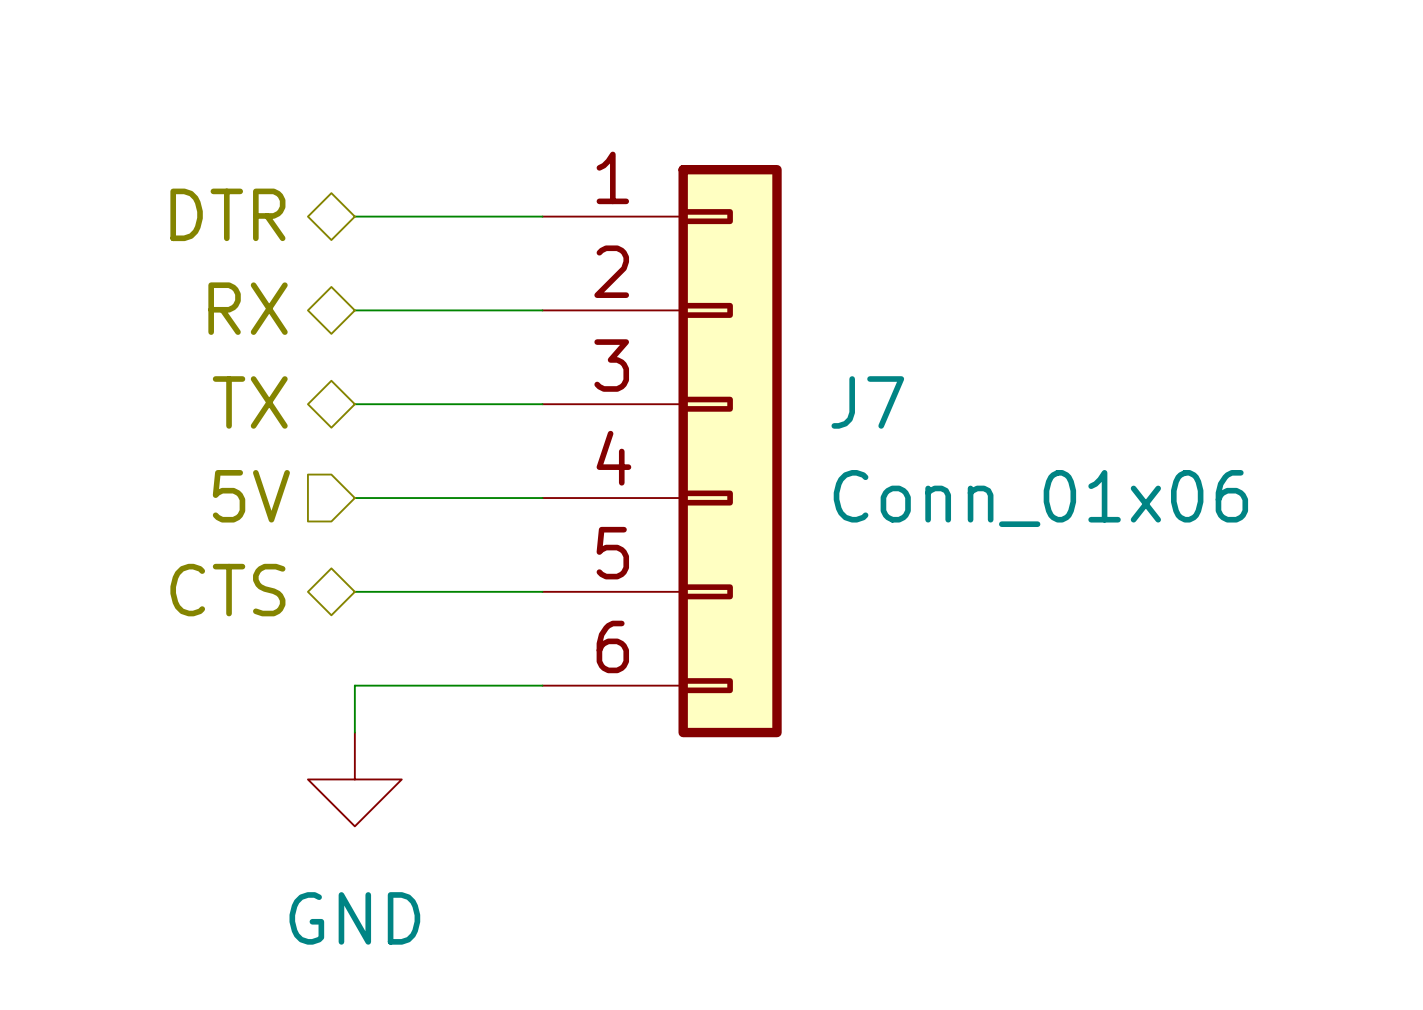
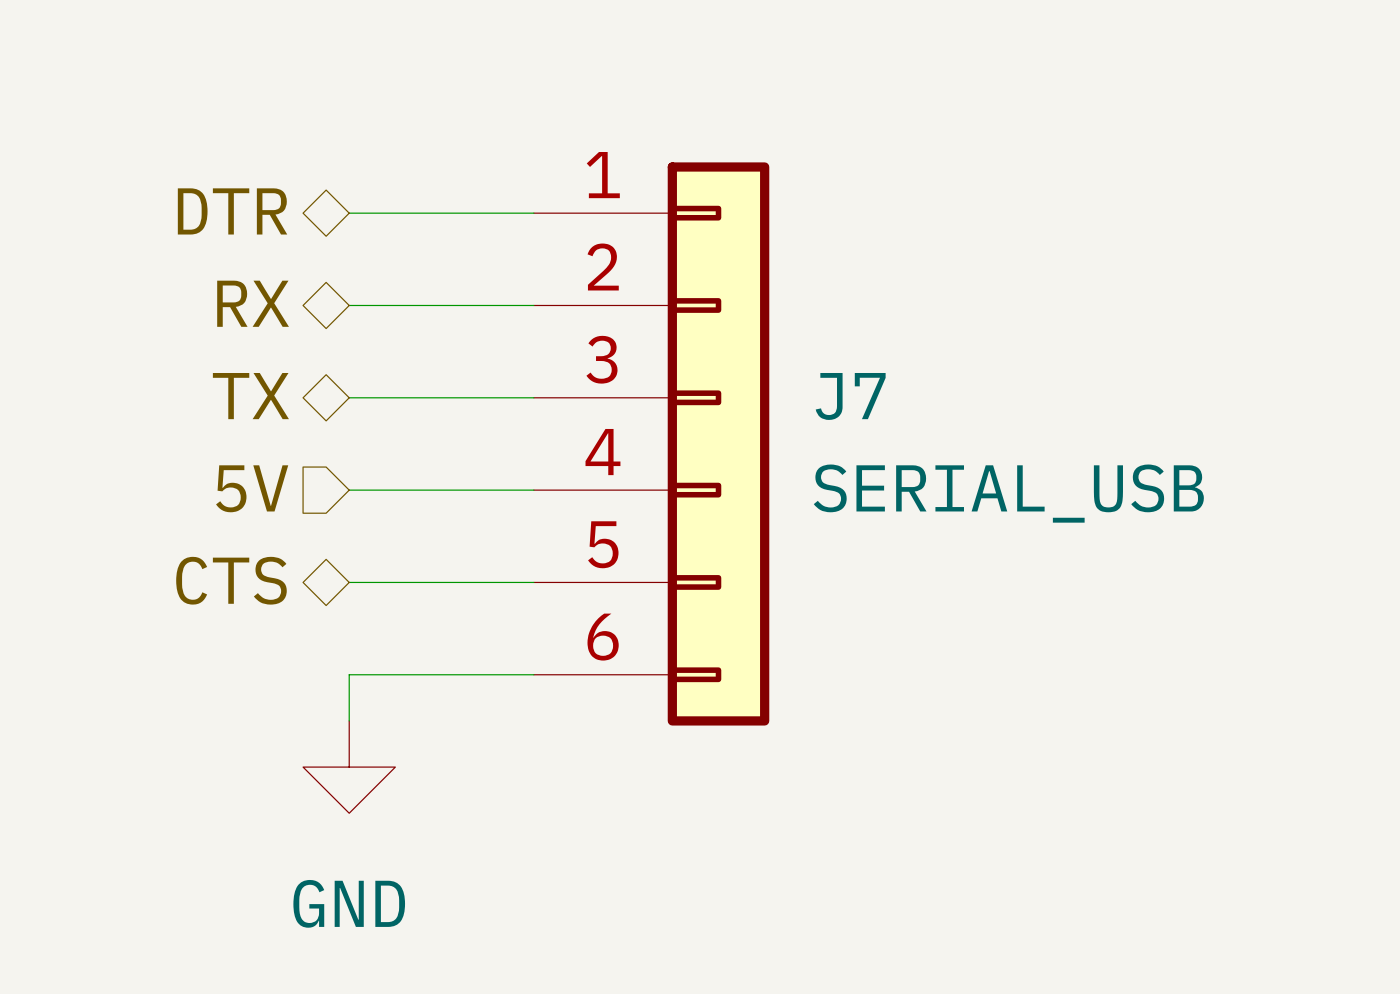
J7 value: Conn_01x06 (1040, 498) -> SERIAL_USB (1008, 493)

